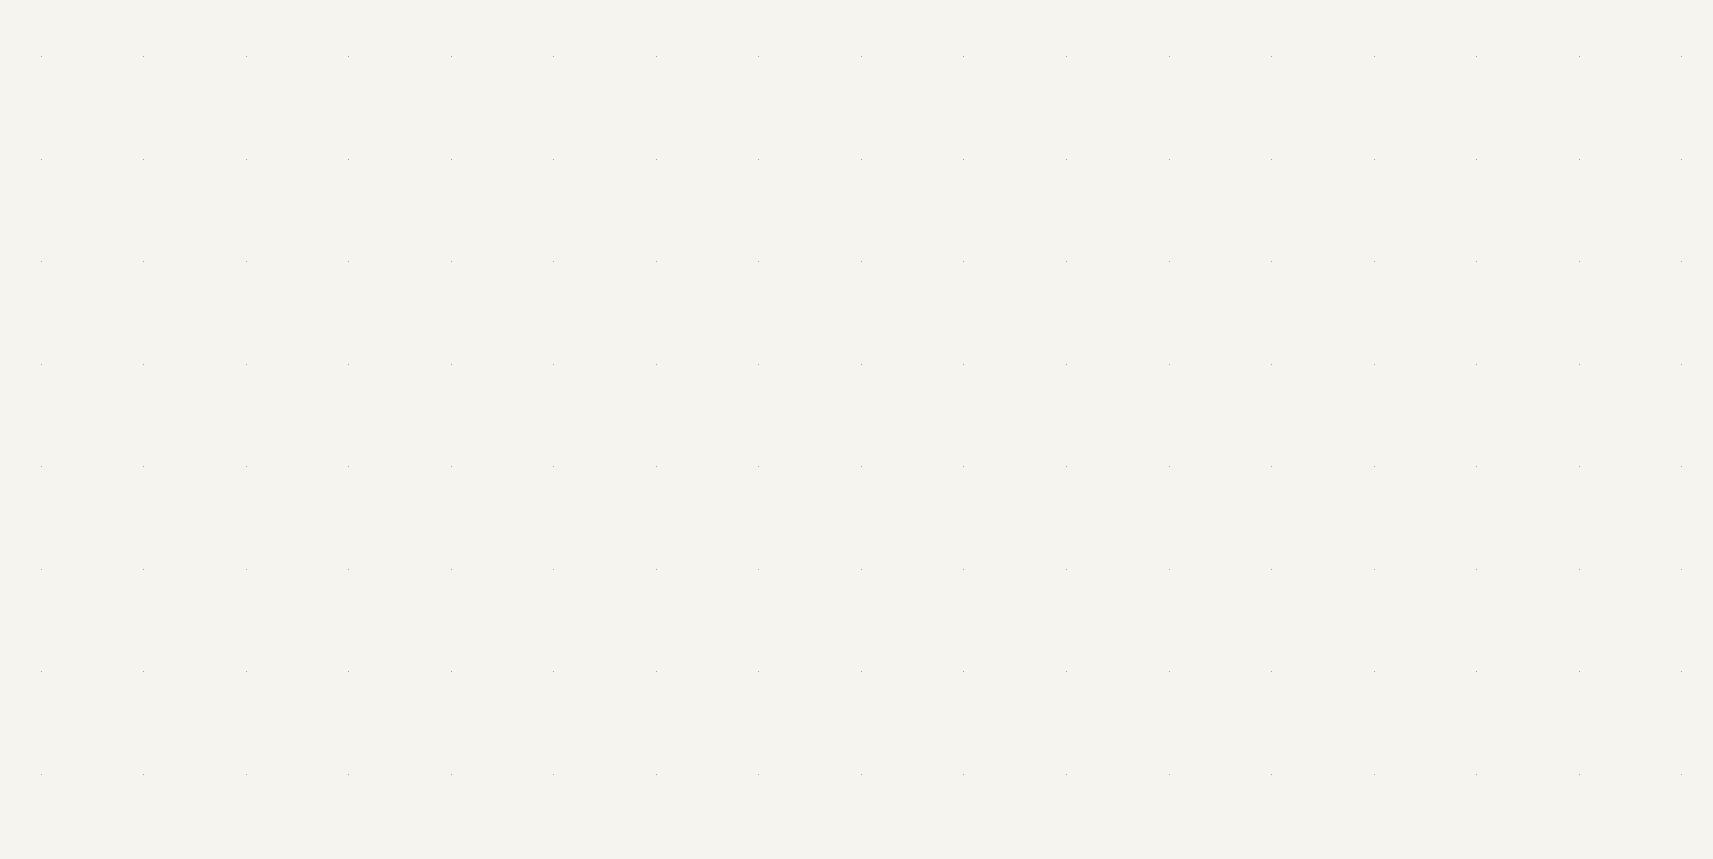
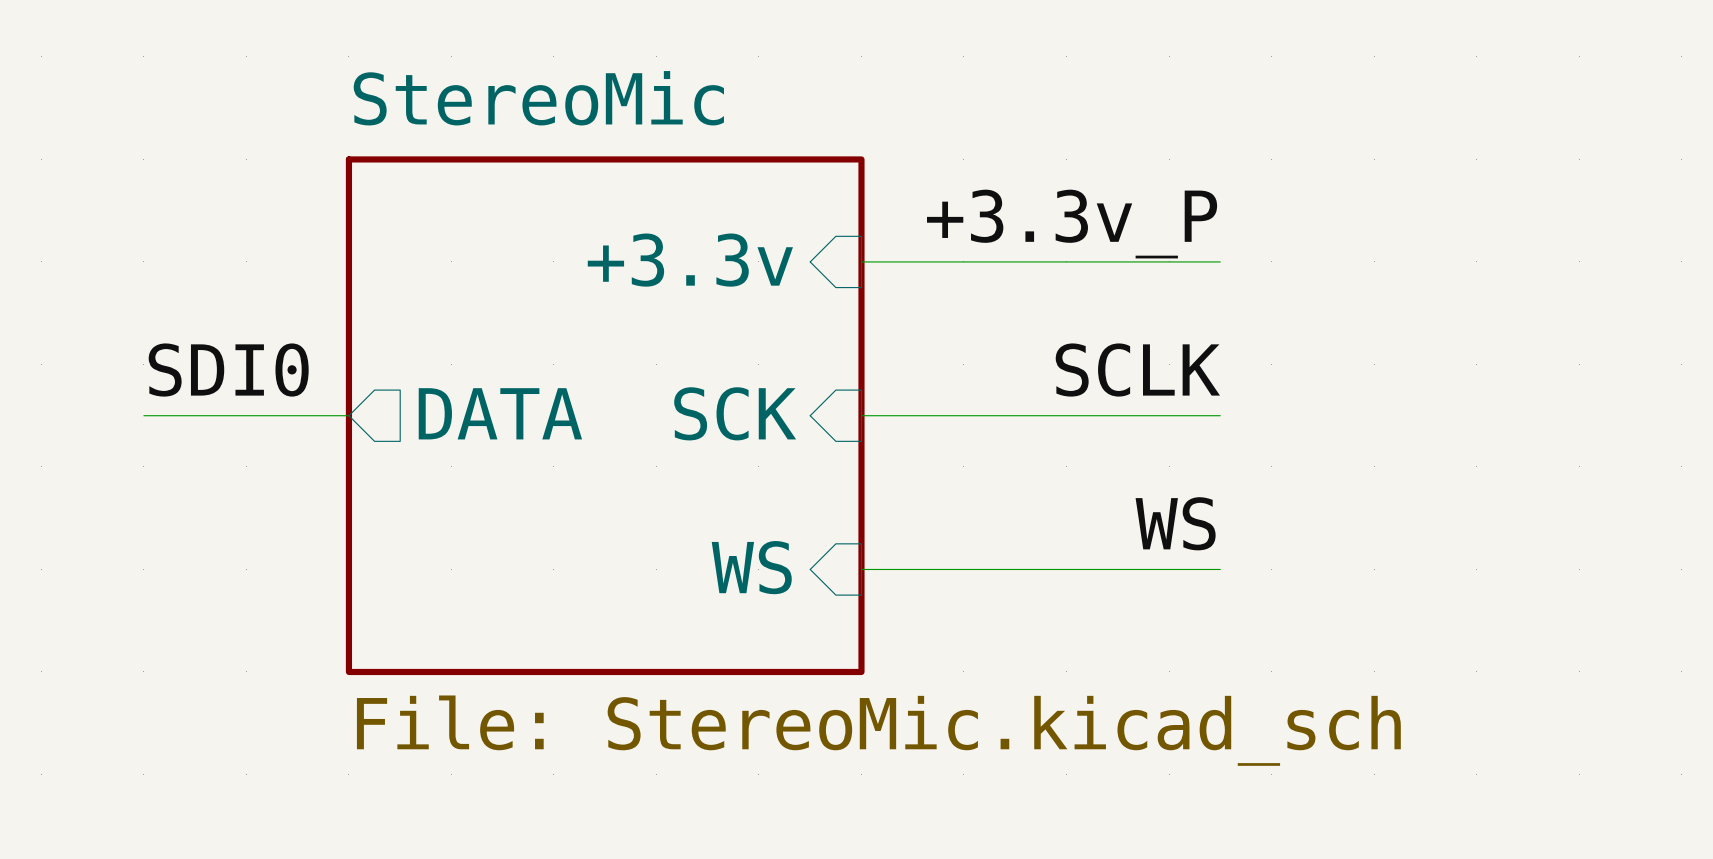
label: none -> +3.3v_P (1072, 224)
sheet pin: none -> +3.3v (690, 260)
wire: none -> (861, 261) (1220, 261)
label: none -> SDI0 (228, 370)
label: none -> SCLK (1137, 370)
sheet pin: none -> DATA (500, 413)
sheet pin: none -> SCK (735, 413)
wire: none -> (143, 415) (348, 415)
sheet StereoMic: none -> File: StereoMic.kicad_sch (605, 415)
wire: none -> (861, 415) (1220, 415)
label: none -> WS (1175, 523)
sheet pin: none -> WS (751, 567)
wire: none -> (861, 569) (1220, 569)

